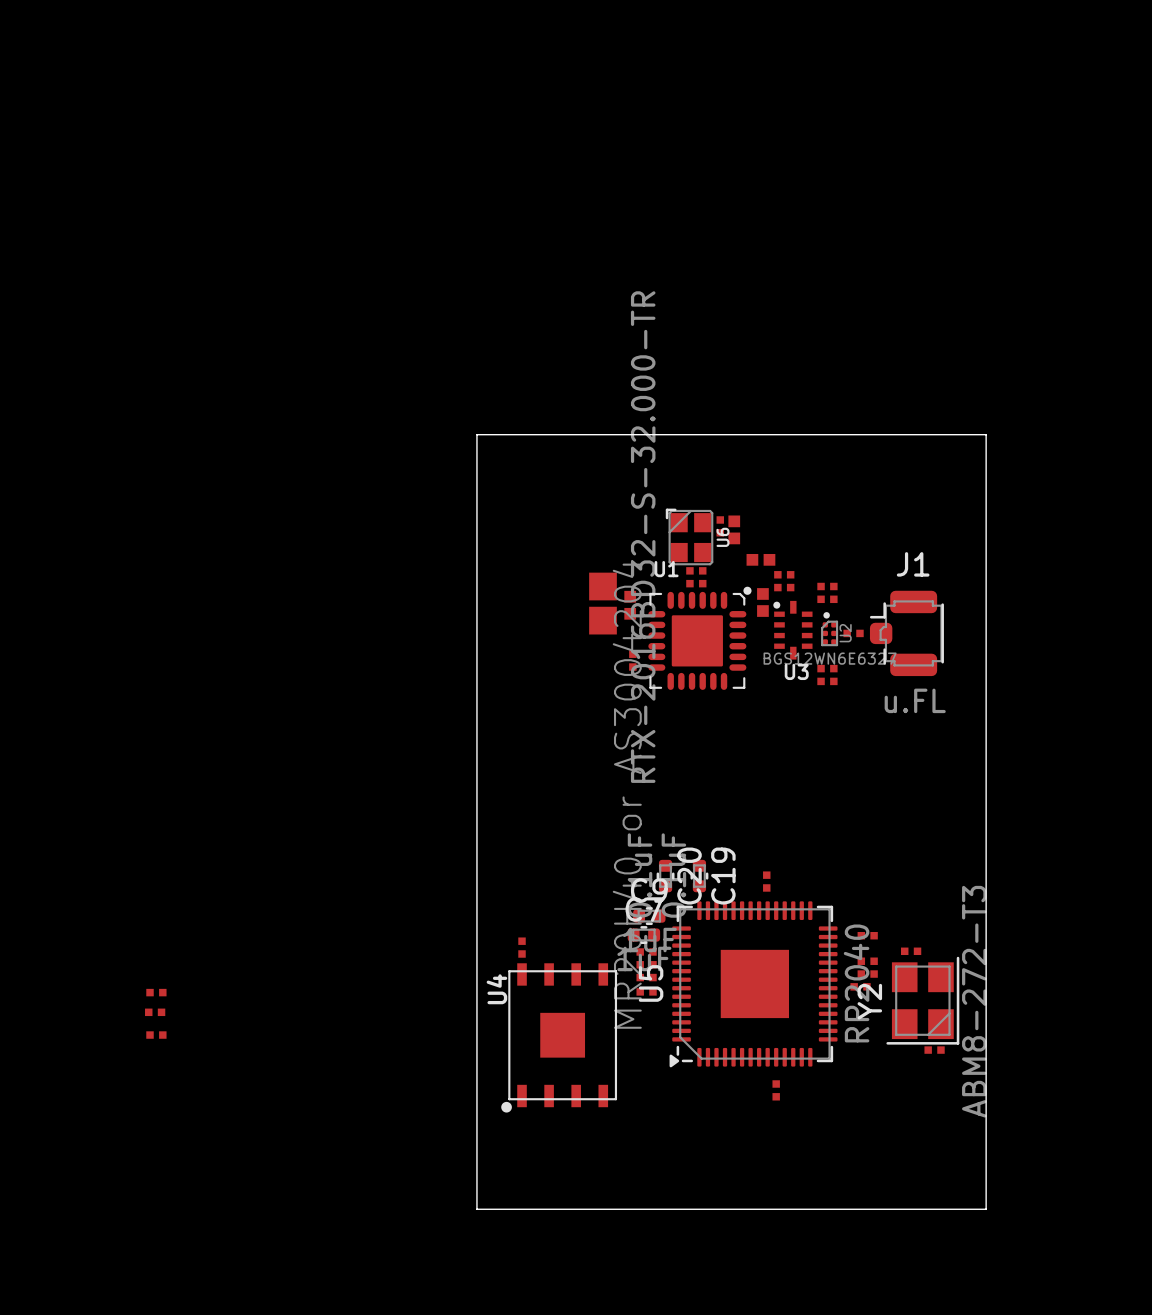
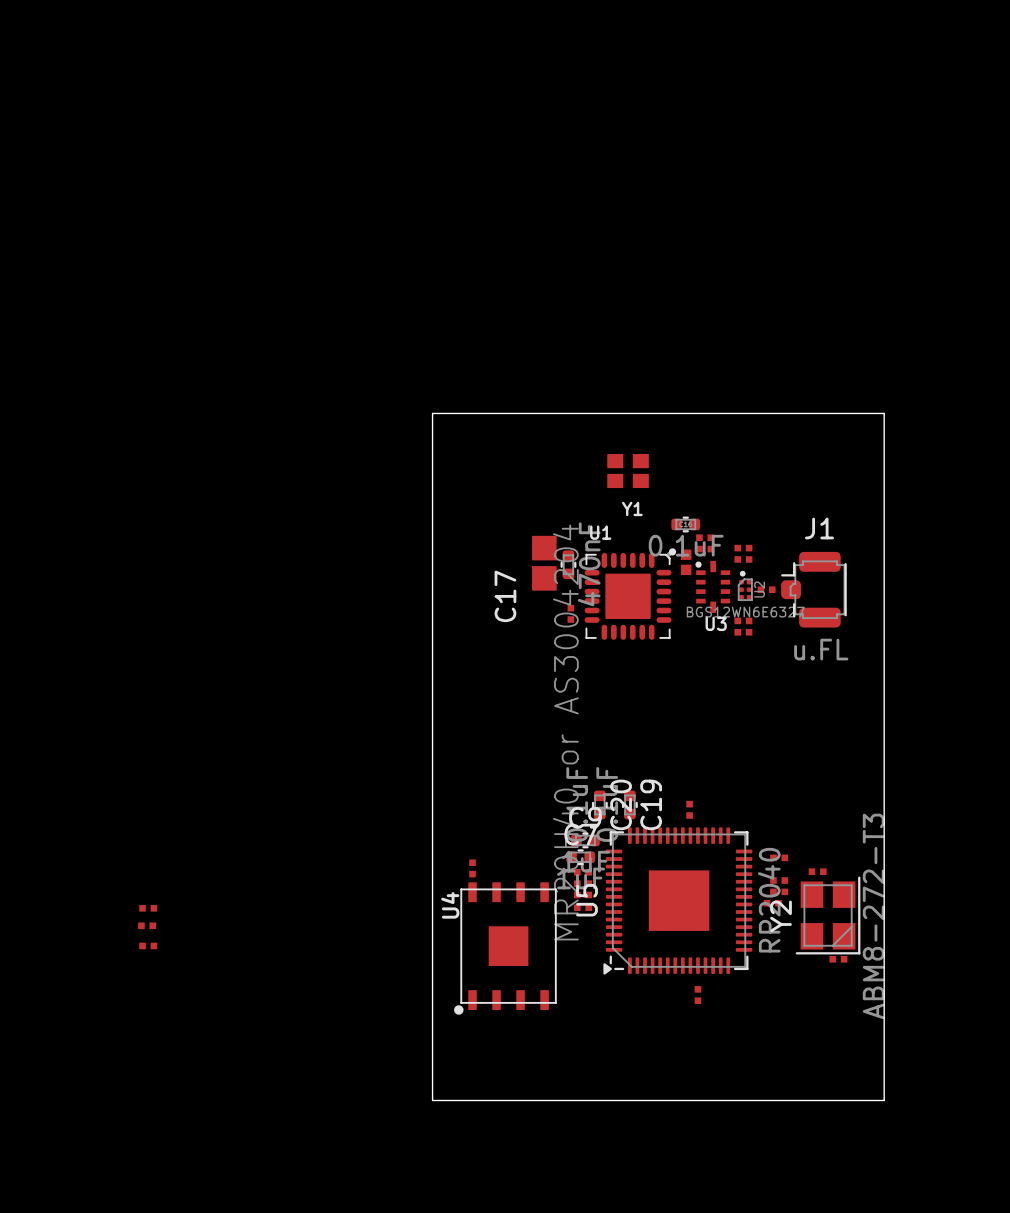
Y1: none -> (628, 471)
part: (720, 526) -> none
part: (734, 529) -> none
U6: RTX-2016BD32-S-32.000-TR (689, 536) -> none
part: (760, 559) -> none
part: none -> 0.1uF (685, 524)
part: (696, 570) -> none
part: (696, 583) -> none
part: (630, 605) -> none
C17: none -> 470nF (568, 564)

